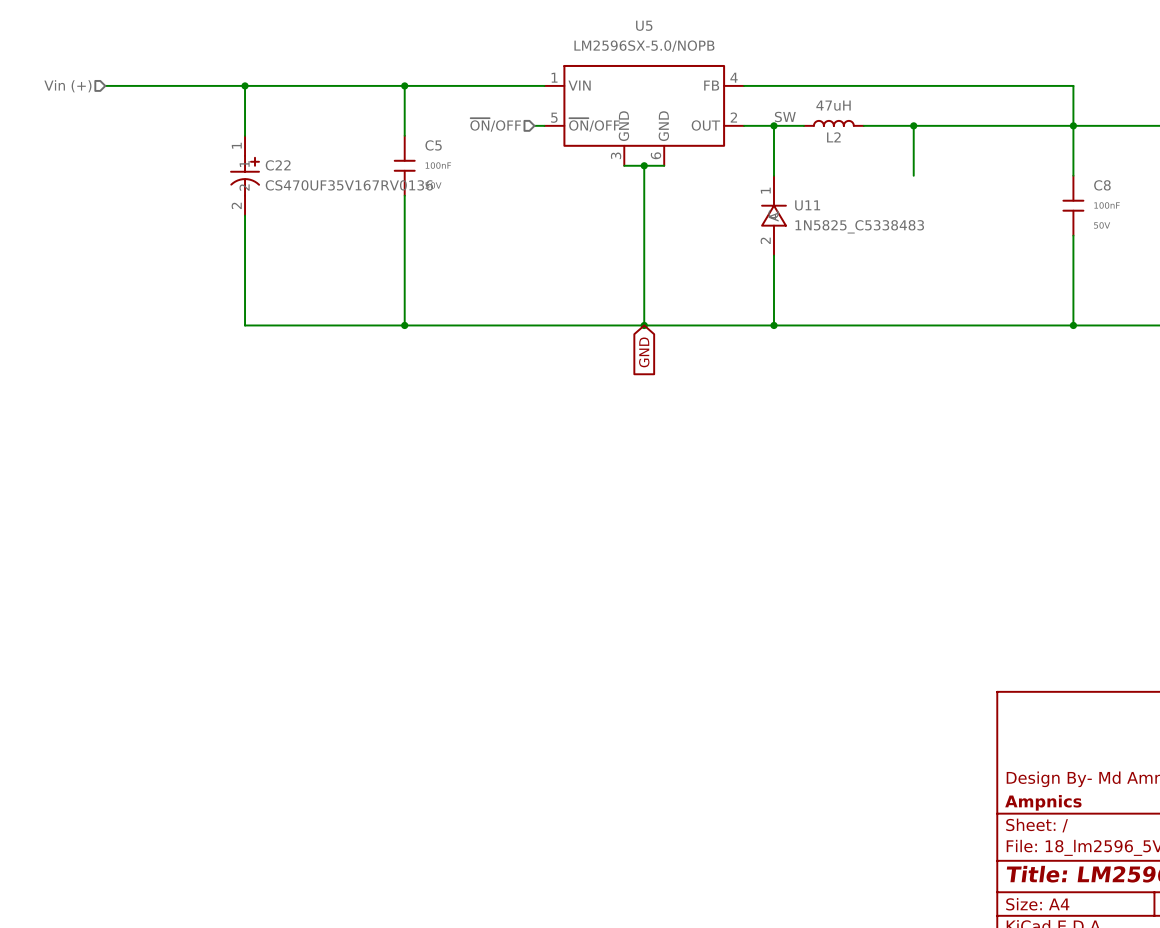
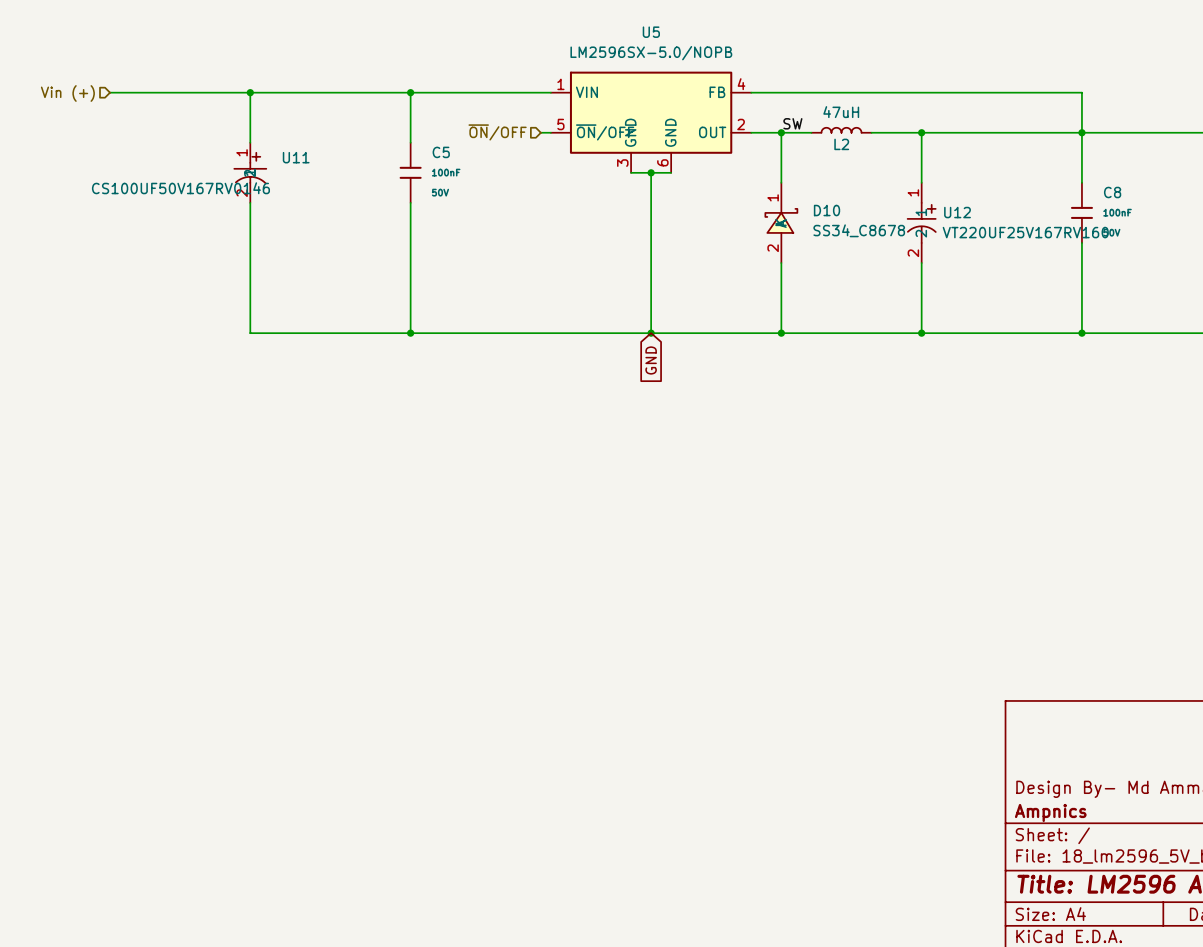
C22: CS470UF35V167RV0136 (245, 175) -> none
U11 symbol: [762, 175, 786, 256] -> [234, 142, 267, 203]
D10: none -> SS34_C8678 (781, 222)
U12: none -> VT220UF25V167RV160 (921, 222)
U11 value: 1N5825_C5338483 (859, 226) -> CS100UF50V167RV0146 (180, 188)
wire: none -> (921, 263) (921, 333)
junction: none -> (921, 333)

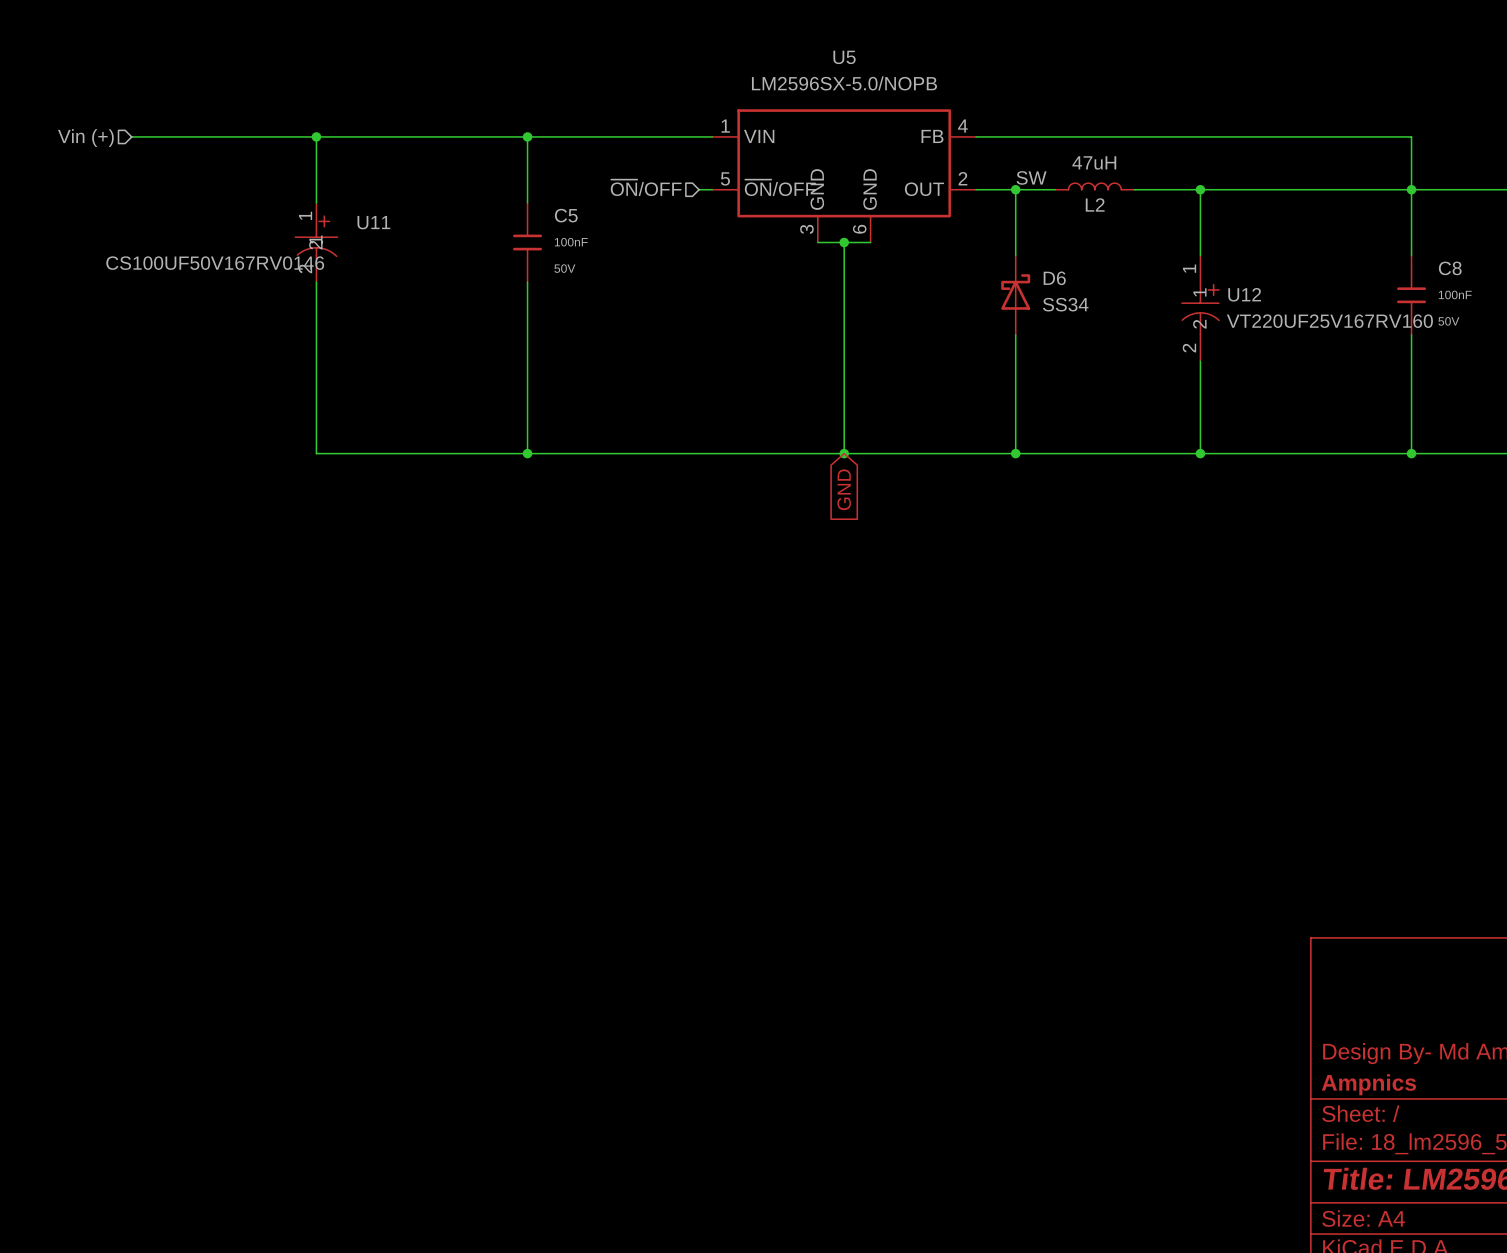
D6: none -> SS34 (1015, 295)
D10: SS34_C8678 (781, 222) -> none

